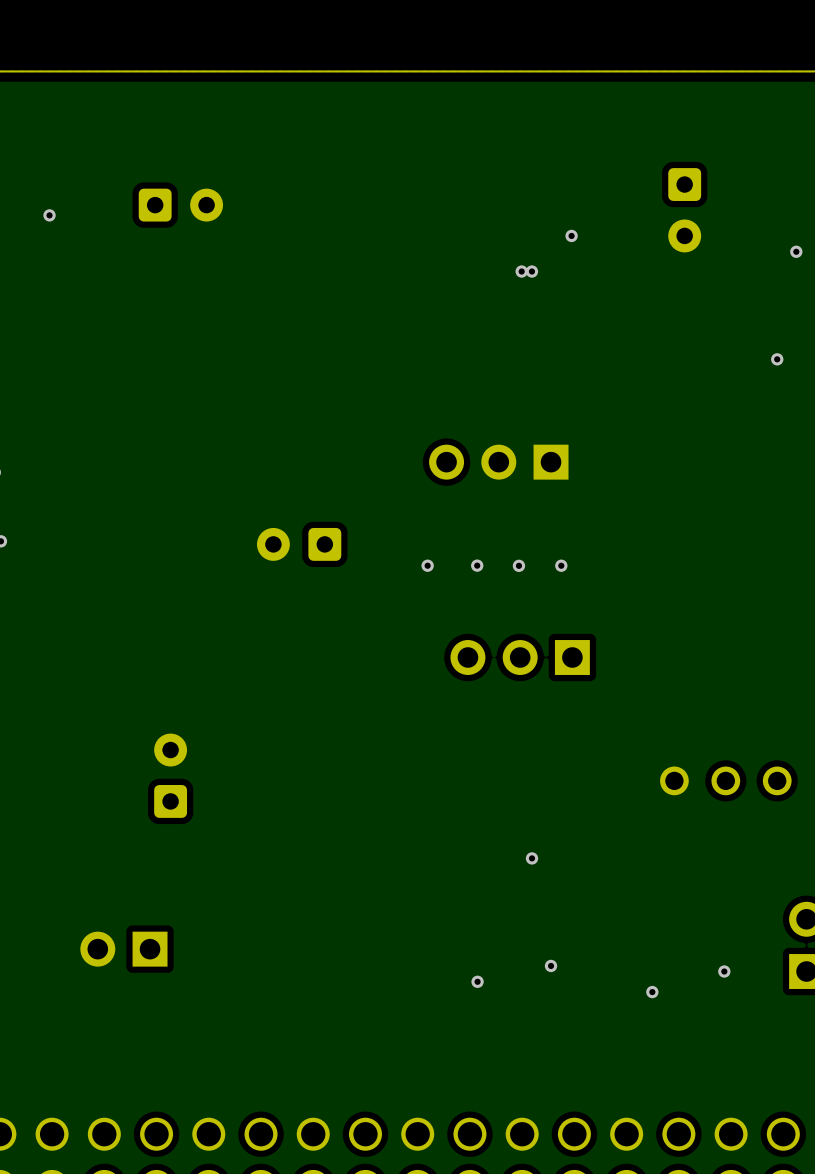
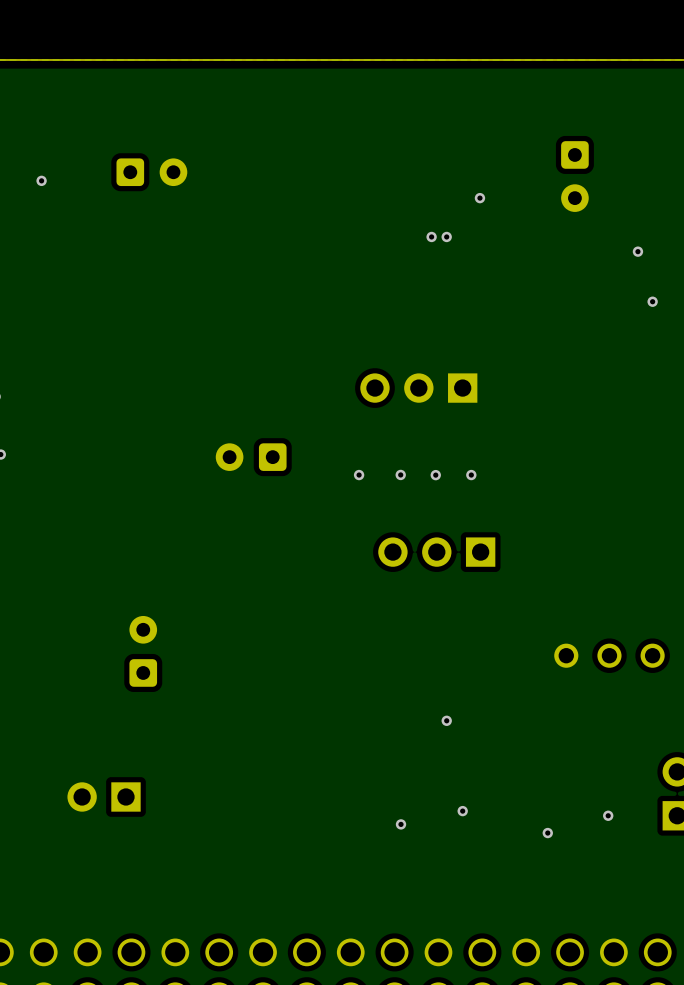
via: (796, 251) -> none
via: (521, 271) -> none
via: (531, 271) -> none
via: none -> (431, 236)
via: none -> (446, 236)
via: none -> (637, 251)

